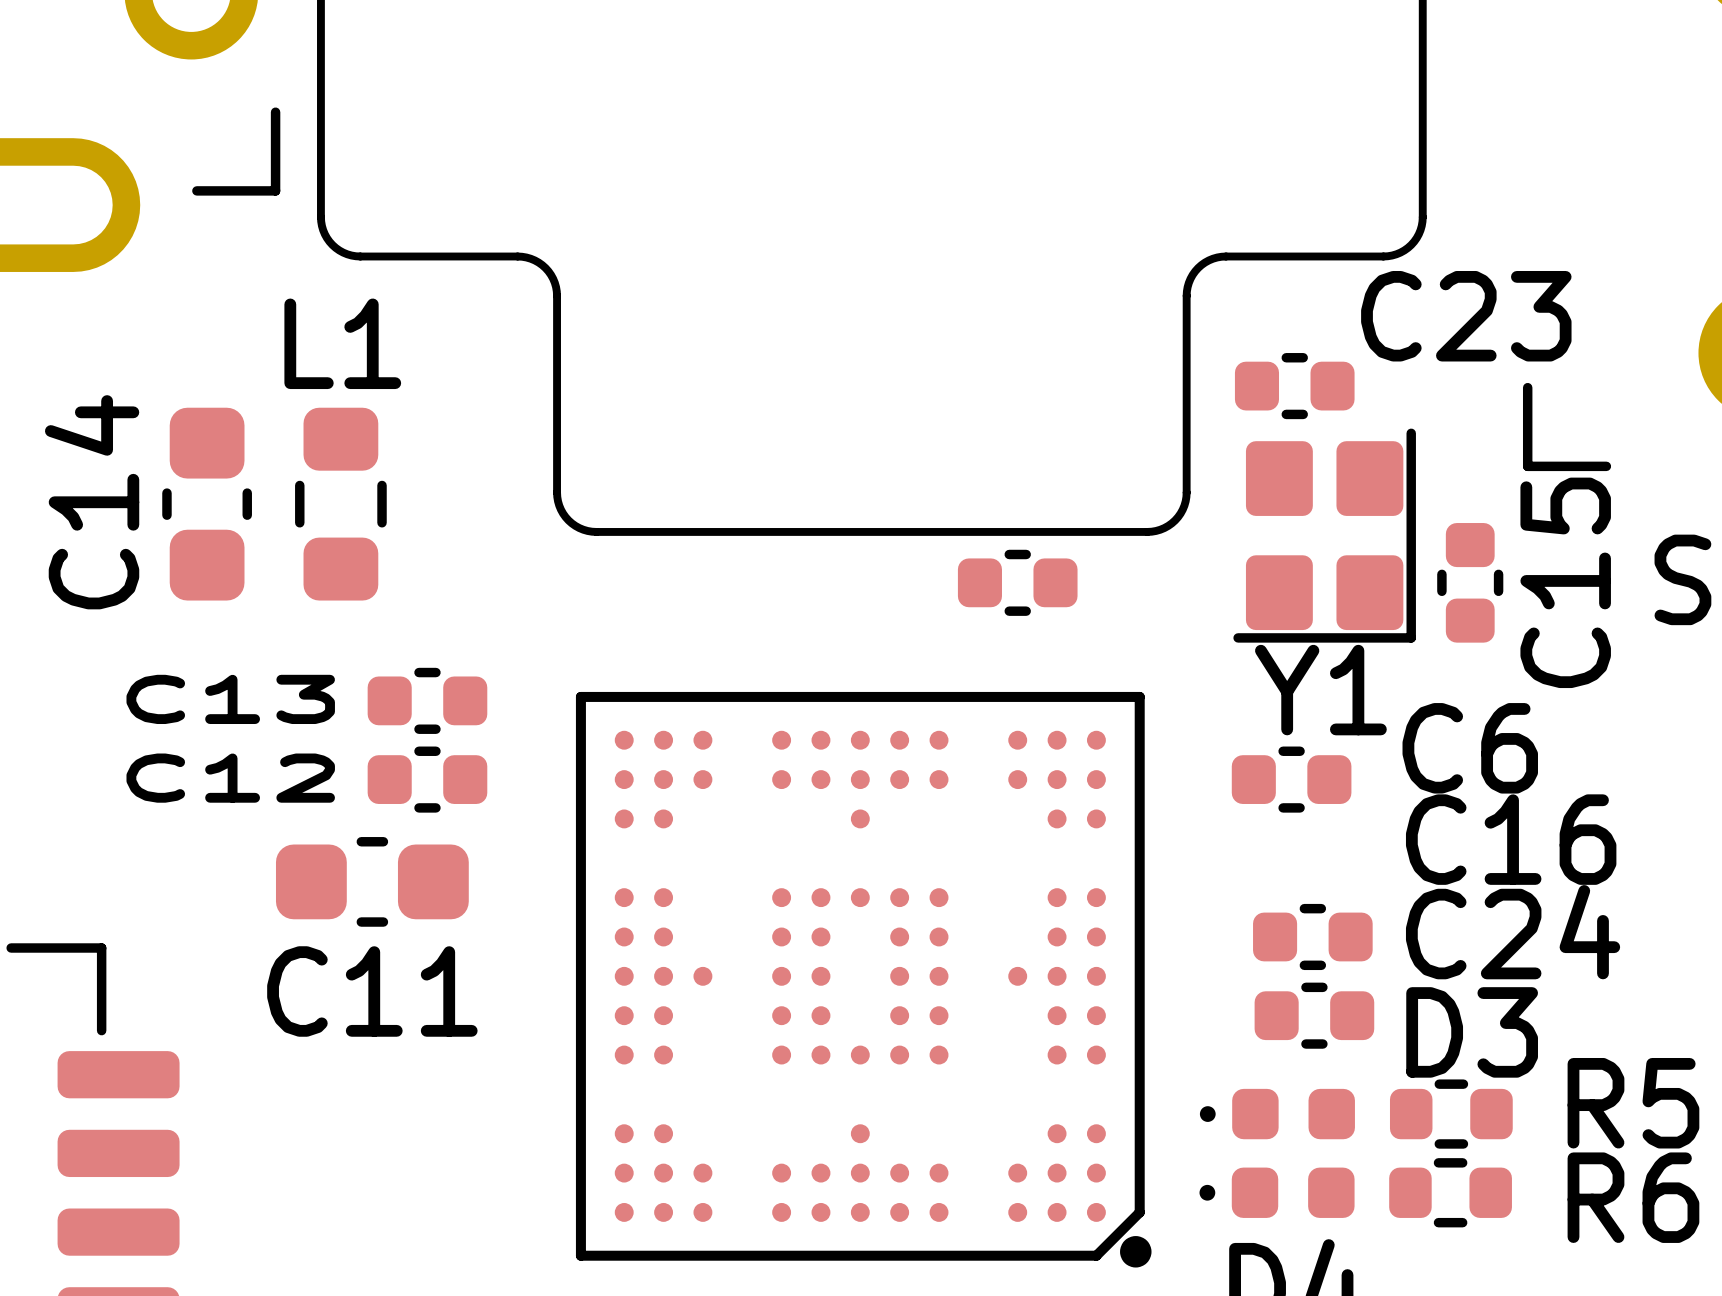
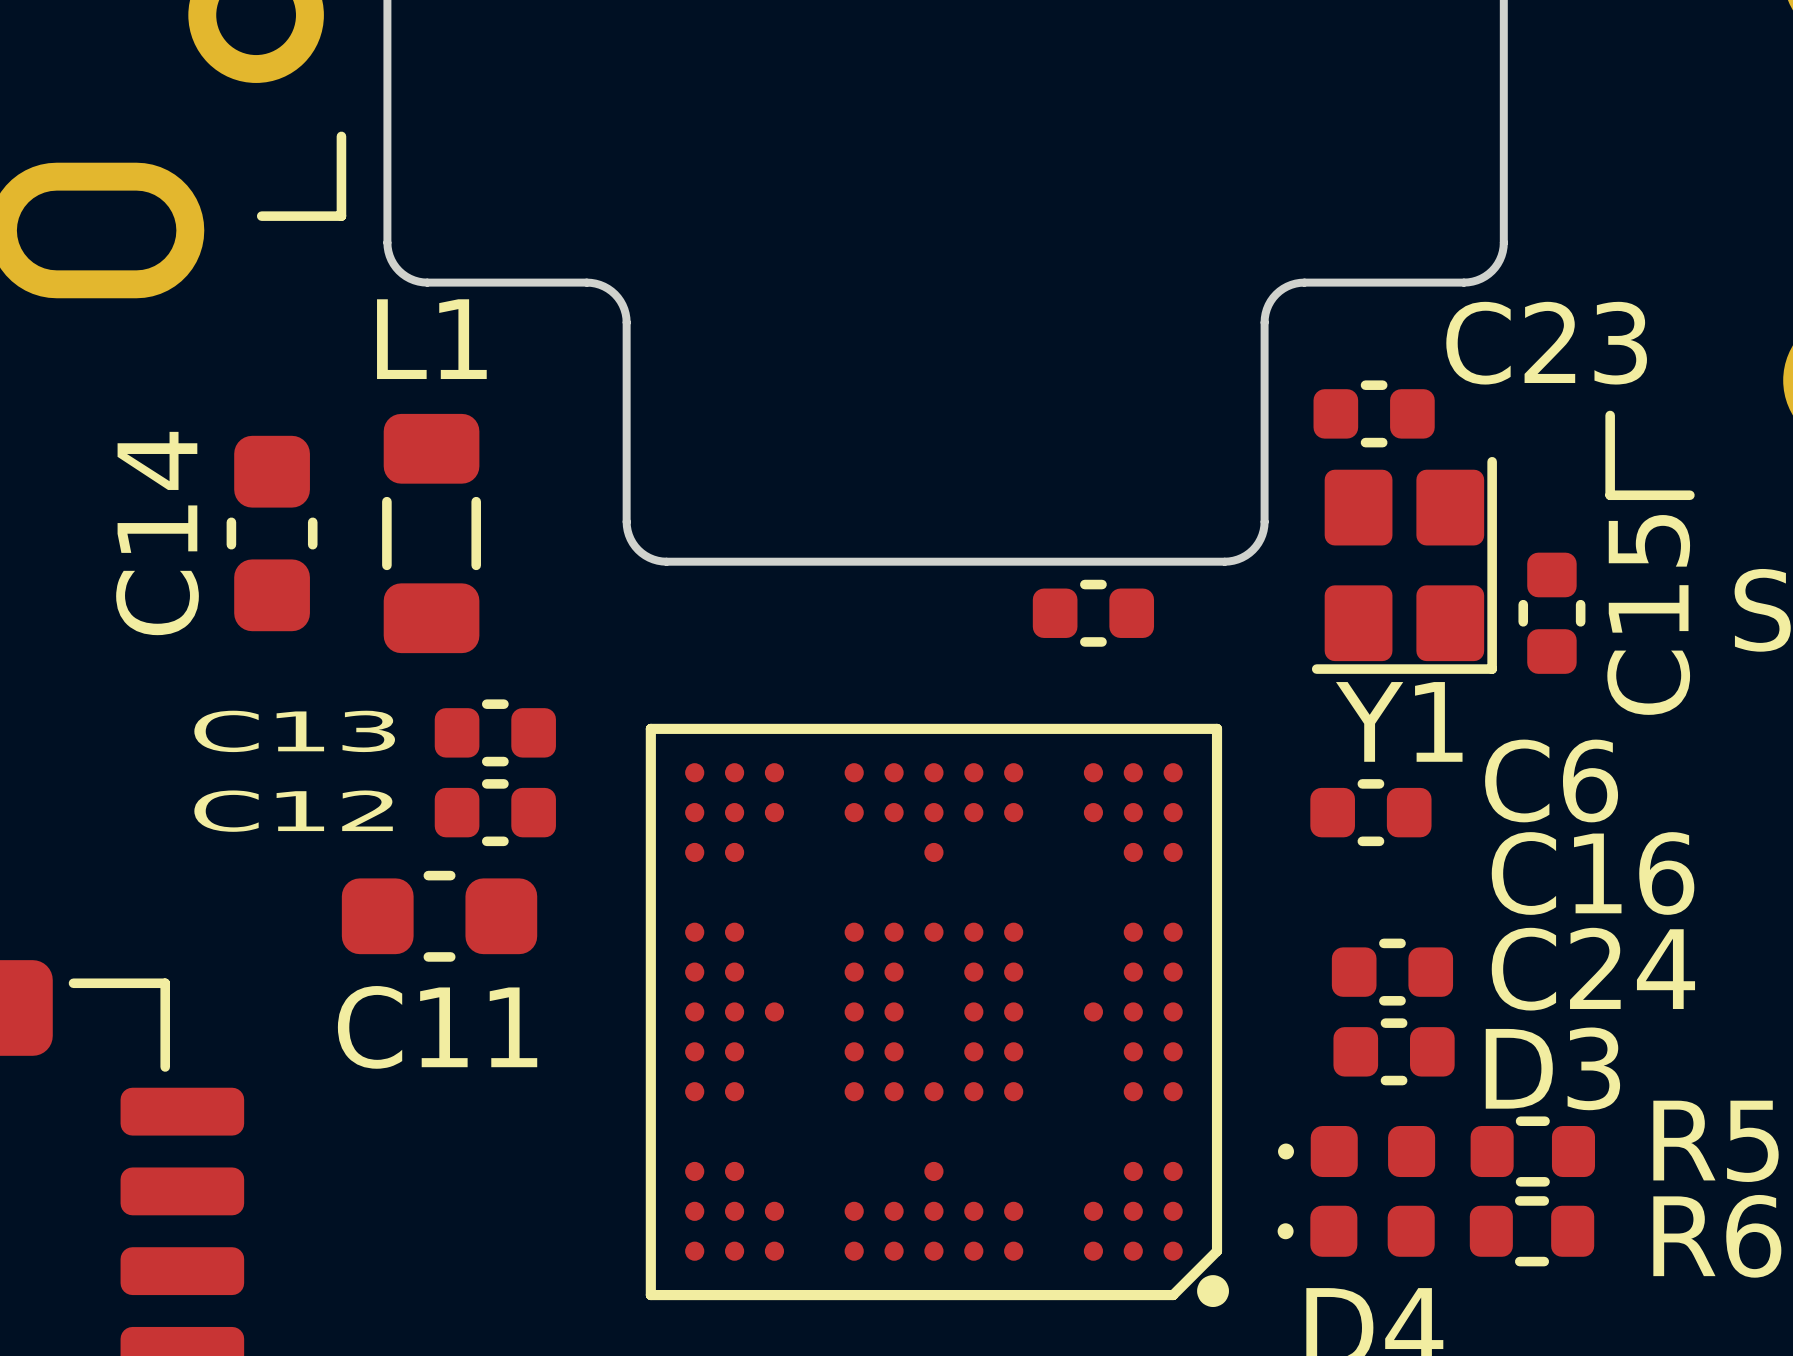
L1 name position: L1 (342, 343) -> L1 (431, 339)
L1 footprint: [295, 407, 387, 601] -> [382, 413, 481, 654]

